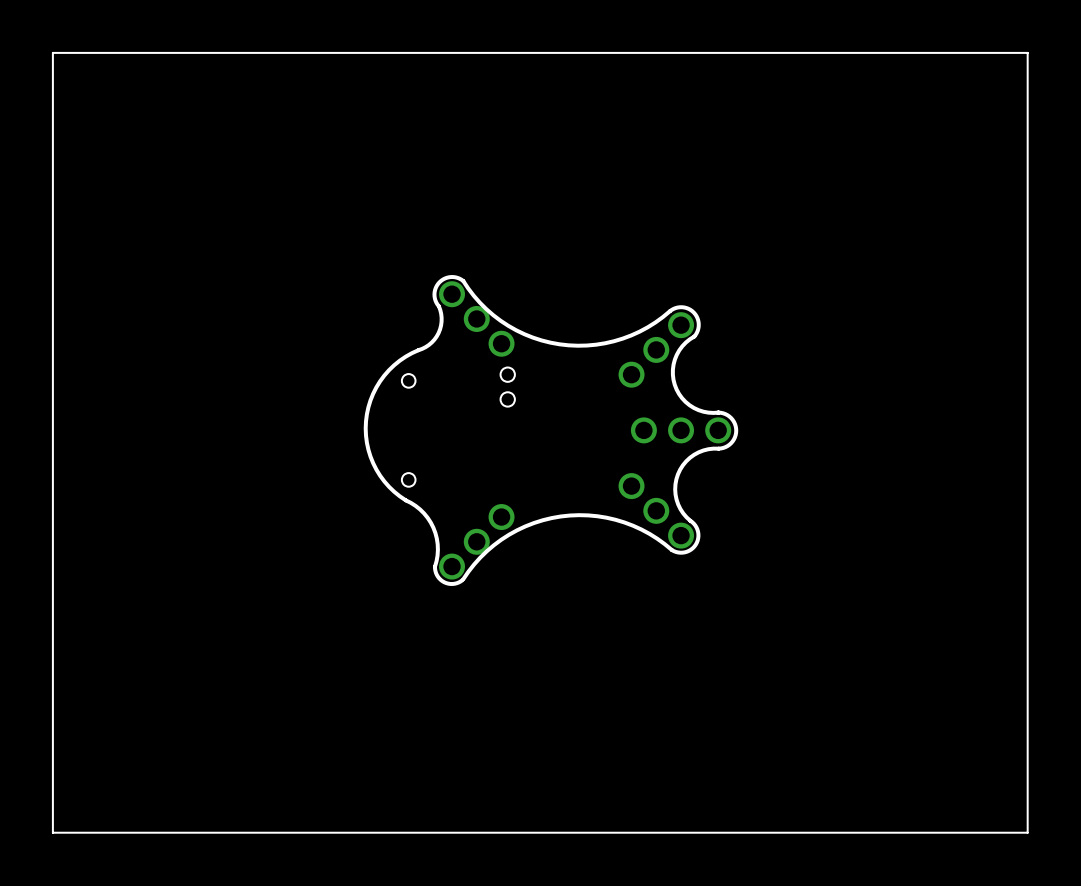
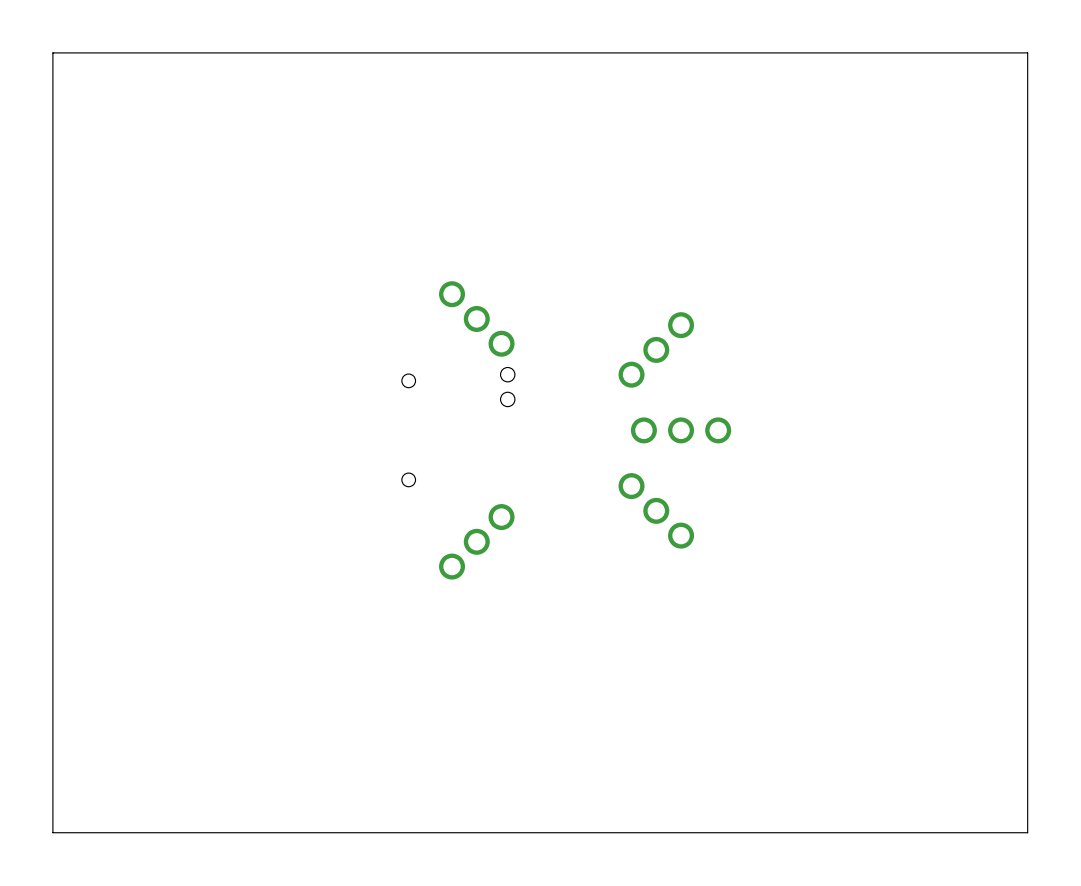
board edge: (718, 412) (727, 415) (733, 421) (736, 430) (733, 439) (725, 447) (708, 449) (694, 454) (682, 465) (676, 479) (675, 494) (678, 504) (698, 531) (696, 542) (691, 549) (682, 552) (673, 551) (649, 533) (615, 519) (588, 515) (560, 516) (534, 523) (509, 534) (480, 557) (463, 579) -> none
board edge: (718, 412) (703, 411) (689, 405) (679, 394) (674, 384) (672, 369) (676, 354) (682, 346) (694, 336) (698, 328) (696, 316) (688, 308) (679, 307) (673, 308) (647, 327) (614, 341) (586, 345) (559, 344) (524, 334) (500, 320) (479, 302) (461, 279) (451, 277) (442, 279) (436, 285) (434, 294) (441, 317) (438, 332) (428, 344) (405, 356) (394, 365) (380, 381) (368, 407) (366, 435) (370, 456) (384, 481) (399, 496) (420, 509) (430, 522) (437, 544) (435, 566) (437, 576) (442, 581) (450, 583) (462, 580) -> none

